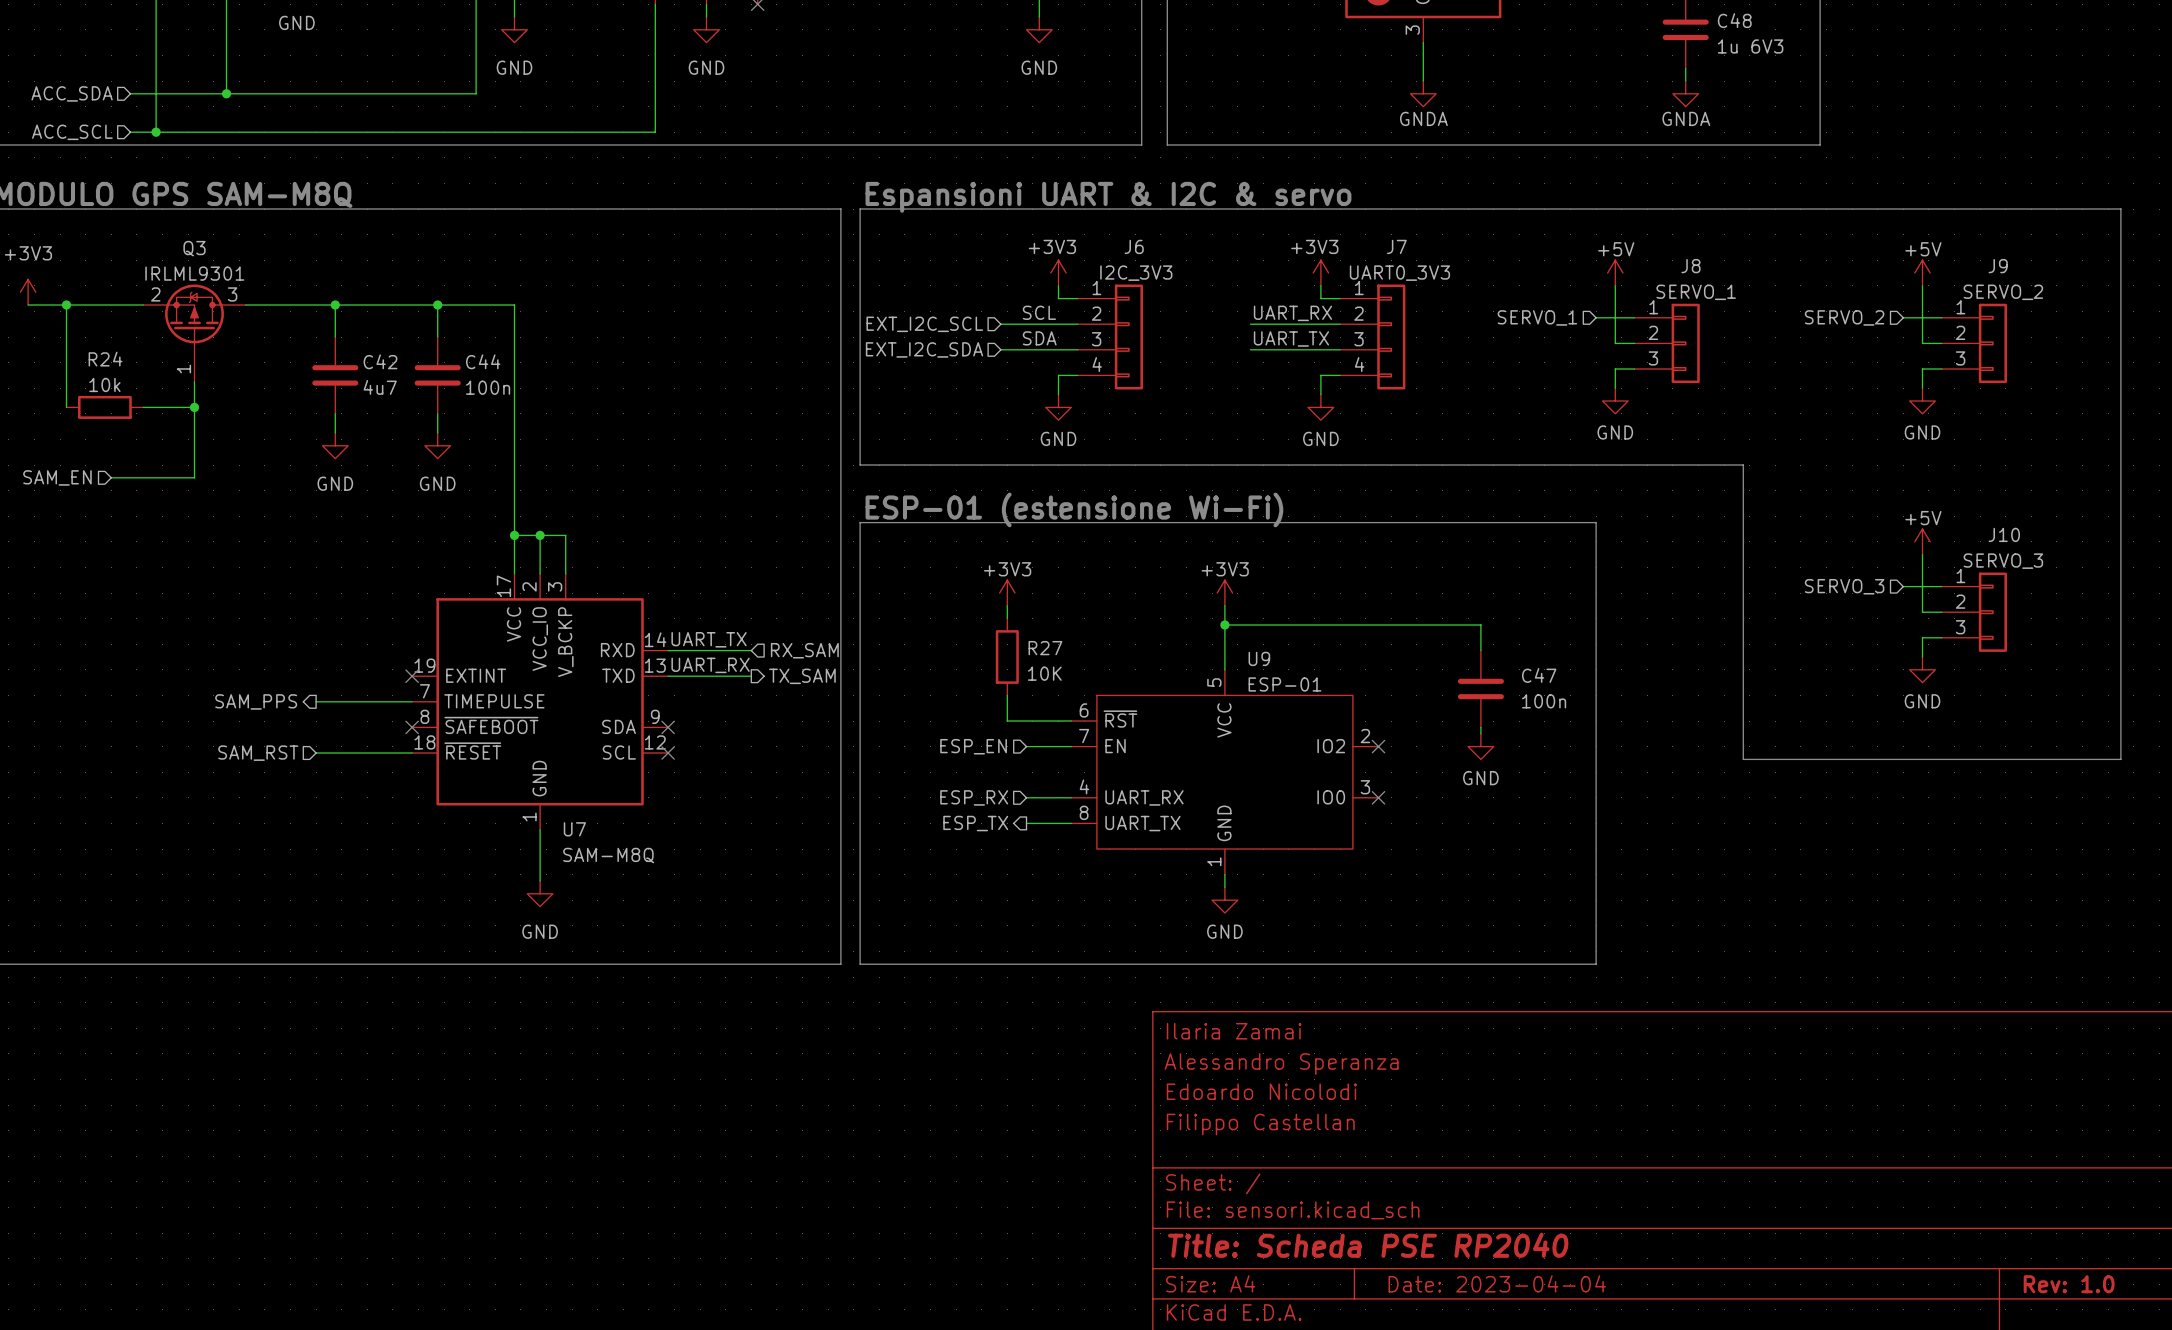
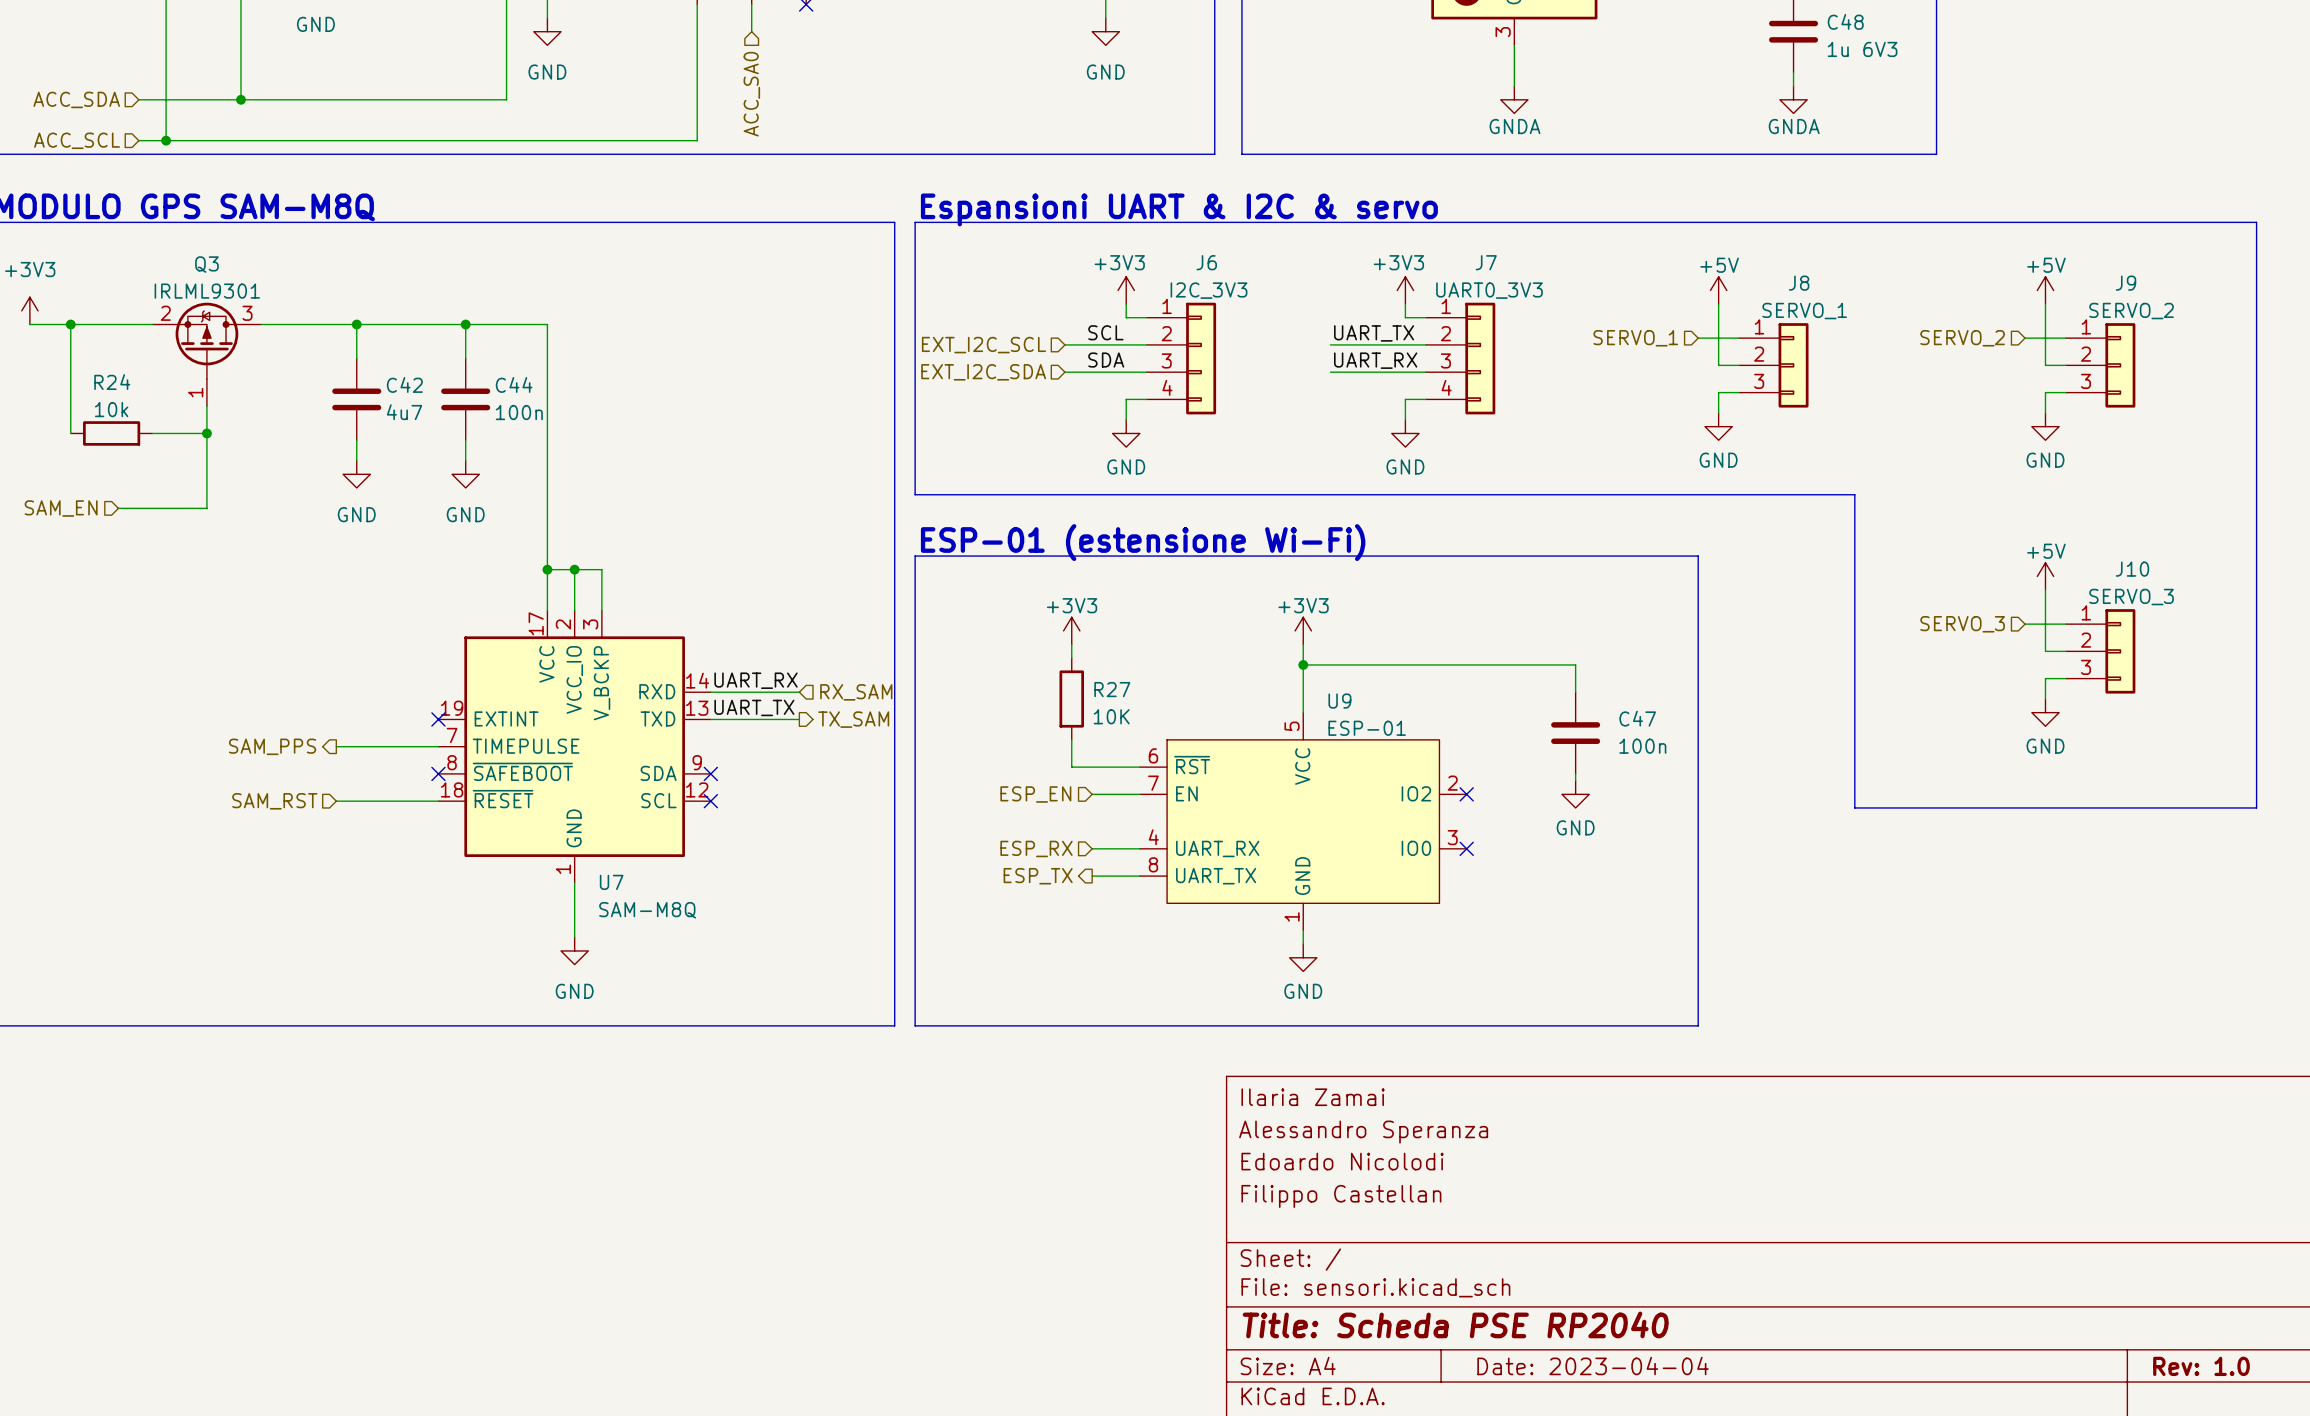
power symbol: GND (706, 29) -> none
hierarchical label: none -> ACC_SA0 (751, 94)
label: UART_RX (1292, 313) -> UART_TX (1374, 333)
label: UART_TX (1291, 338) -> UART_RX (1375, 360)
label: UART_TX (709, 639) -> UART_RX (756, 680)
label: UART_RX (710, 665) -> UART_TX (754, 707)

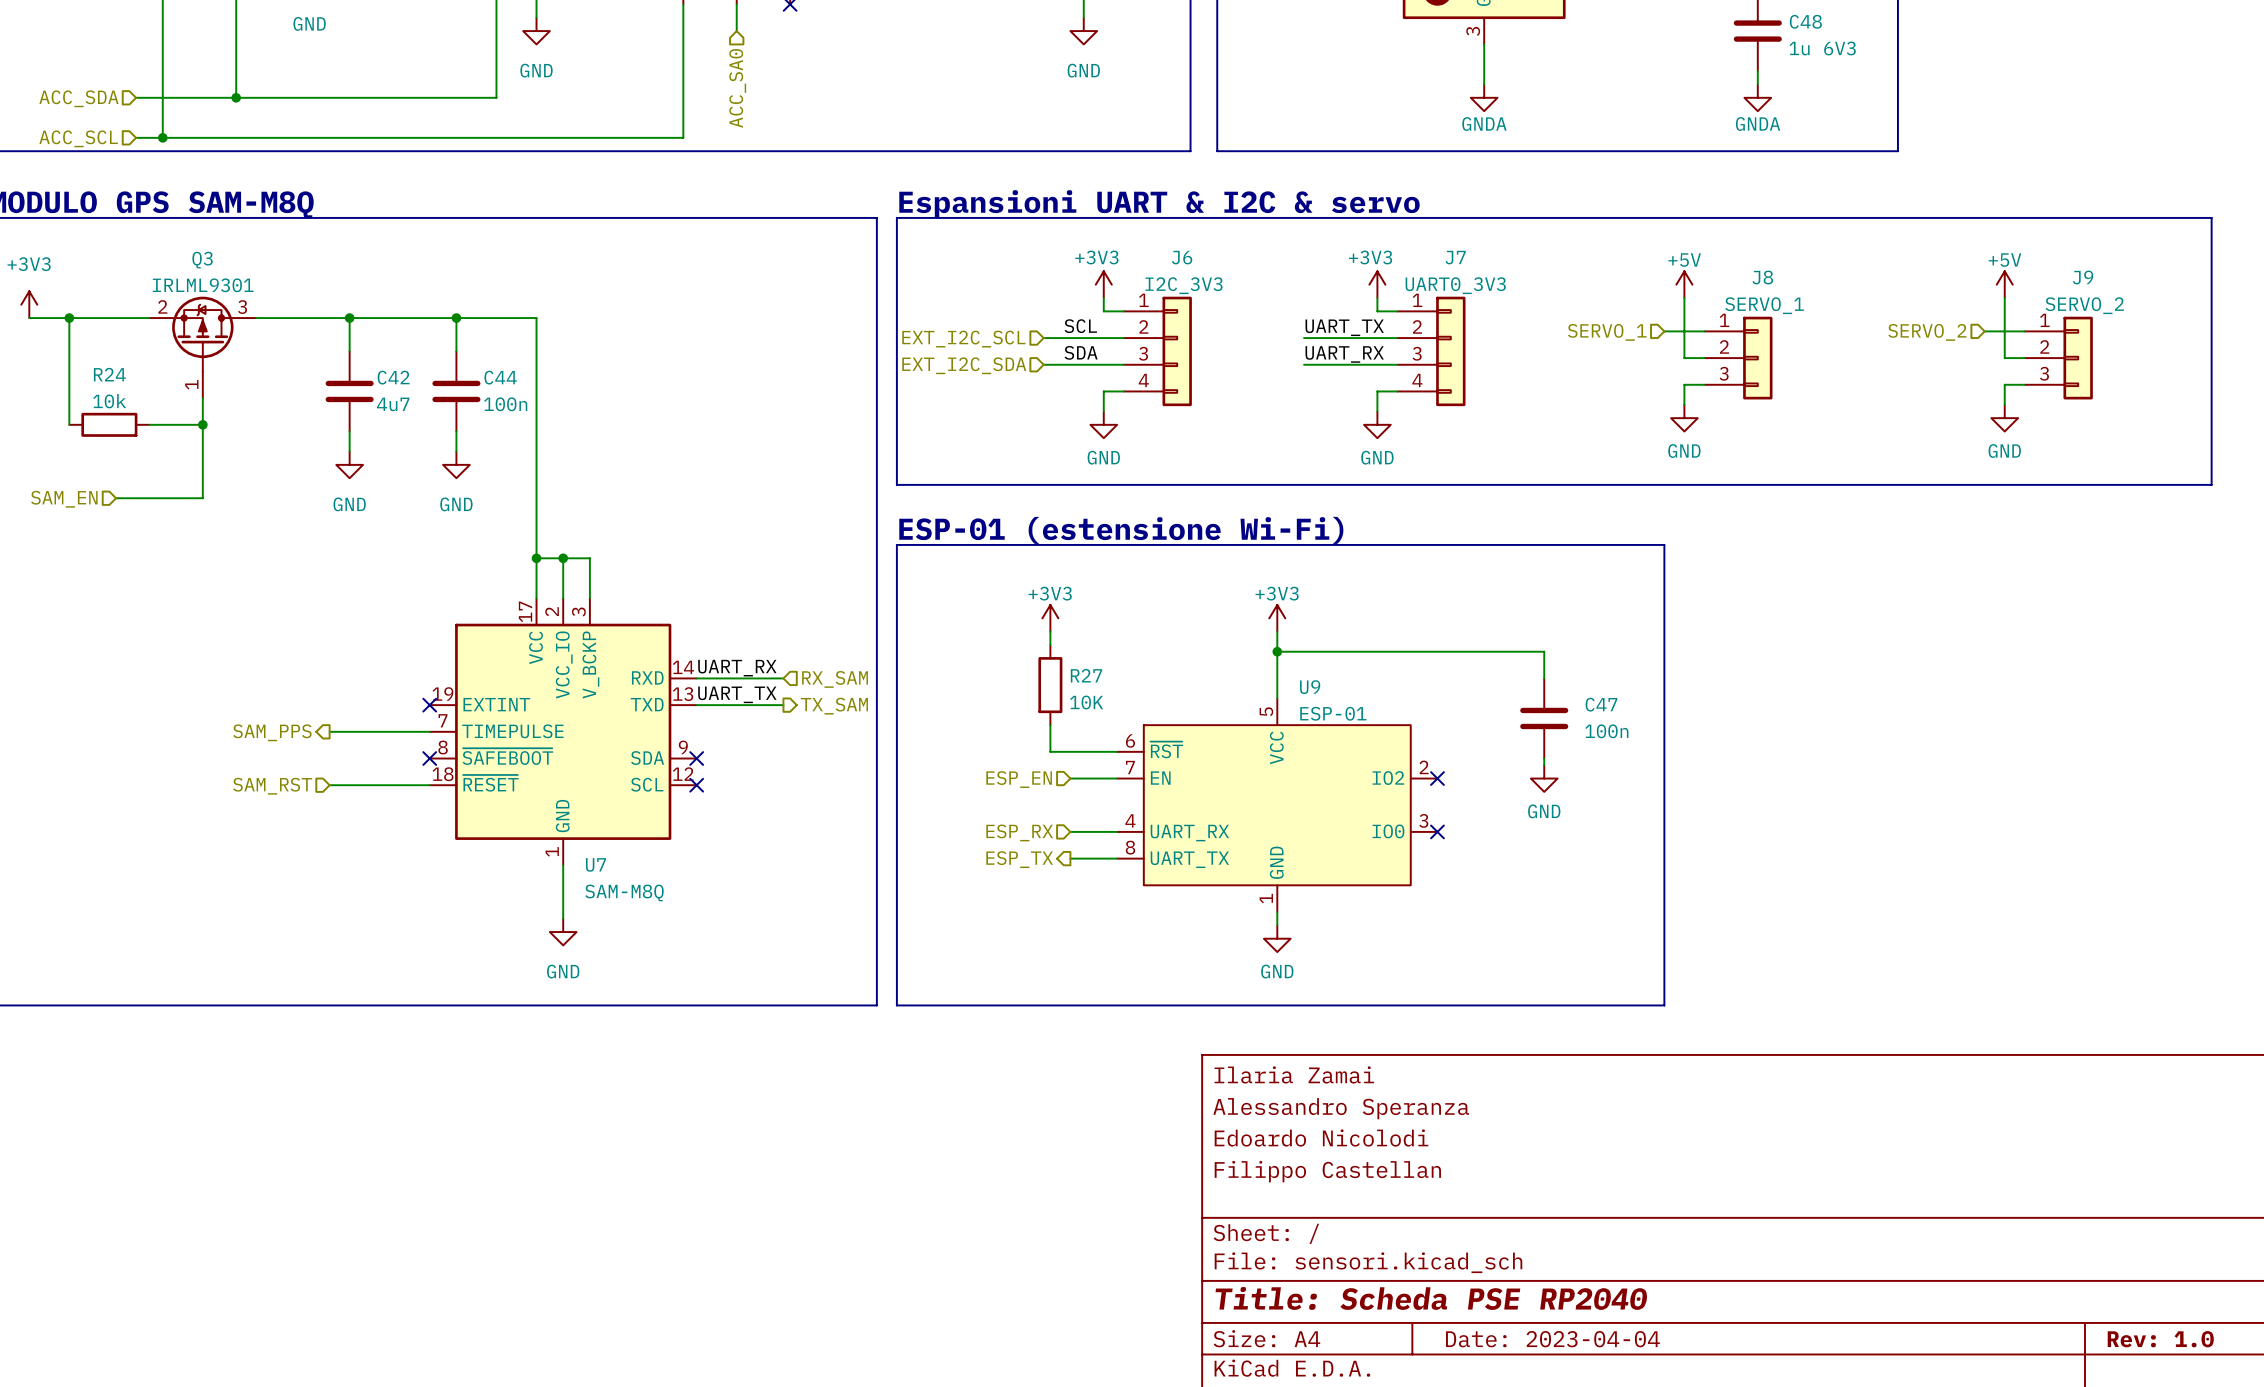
line: (1854, 494) (1854, 807) (2256, 807) (2256, 494) -> (1817, 484) (2211, 484)
power symbol: +5V (2045, 576) -> none
wire: (2045, 590) (2045, 651) (2065, 651) -> none
hierarchical label: SERVO_3 (1962, 624) -> none
wire: (2025, 624) (2065, 624) -> none
J10: SERVO_3 (2100, 651) -> none
wire: (2065, 678) (2045, 678) (2045, 699) -> none
power symbol: GND (2045, 712) -> none

